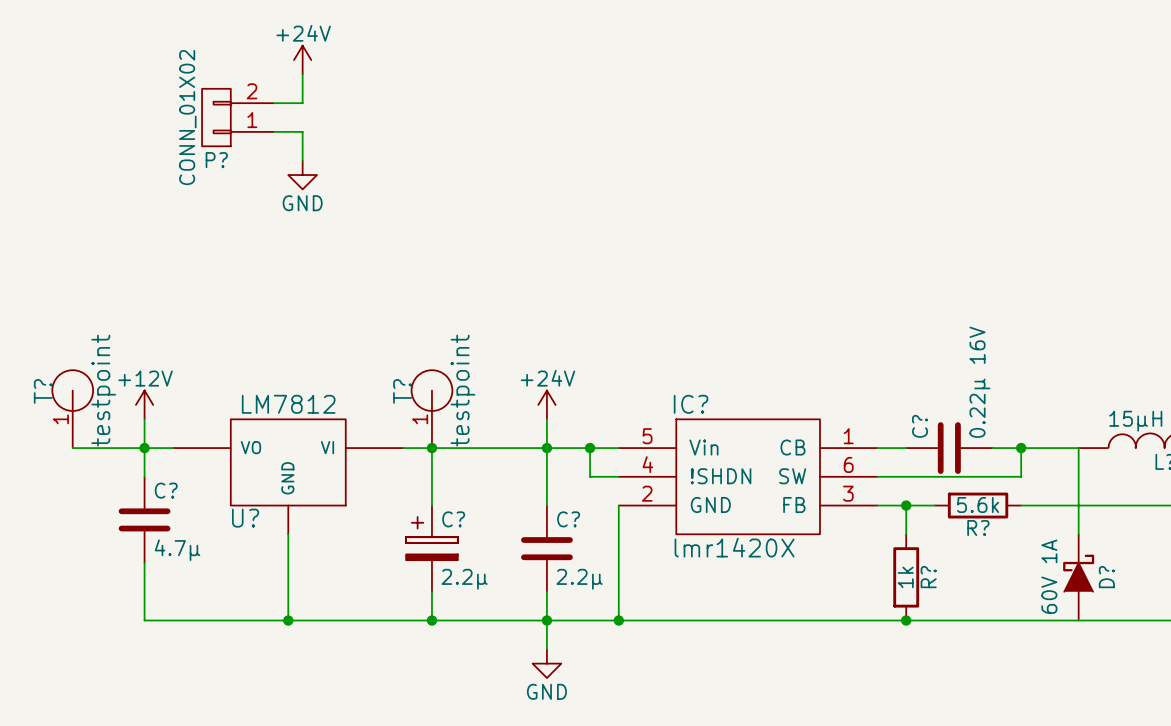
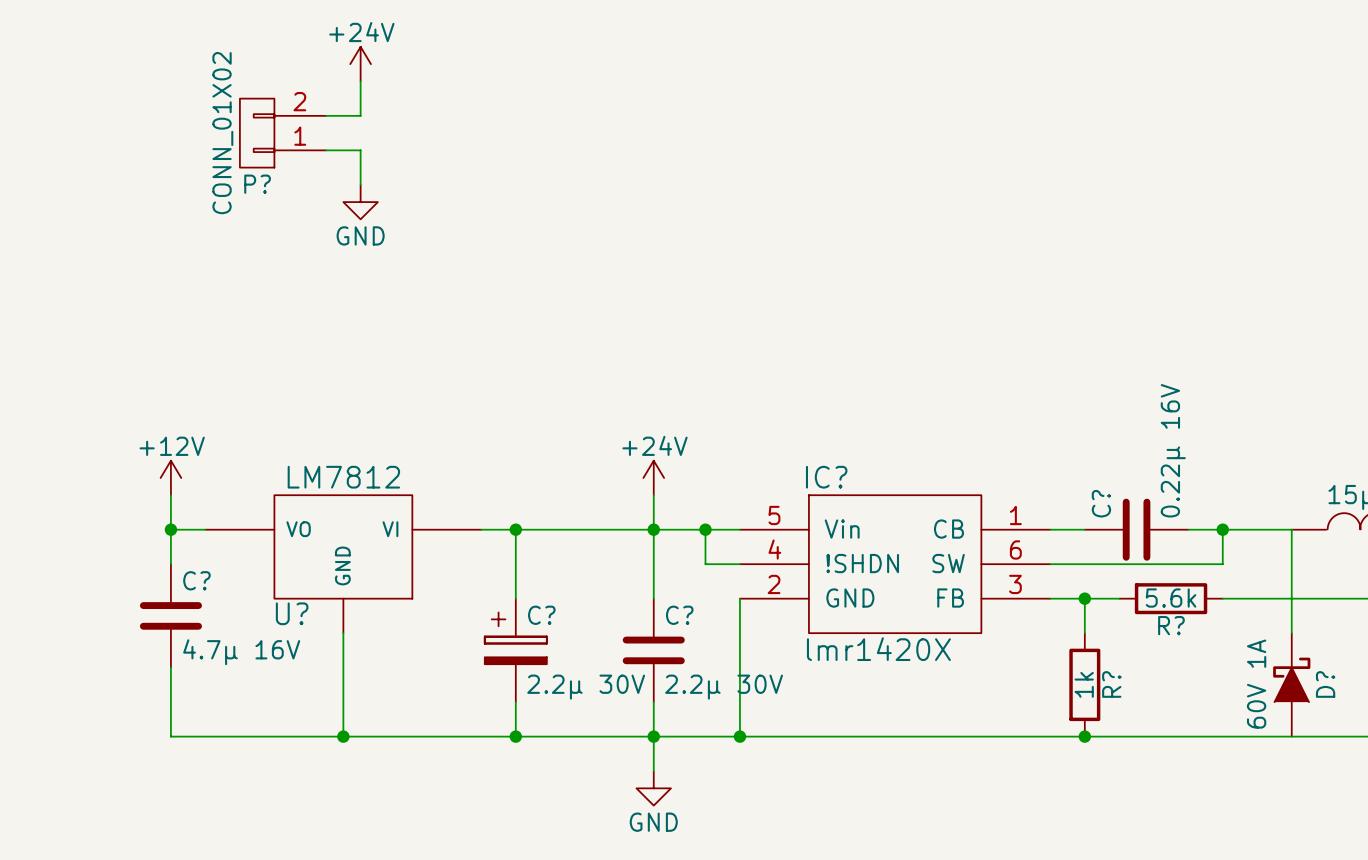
T?: testpoint (72, 409) -> none
T?: testpoint (431, 409) -> none
wire: (72, 448) (144, 448) -> none
C? value: 4.7µ (177, 550) -> 4.7µ 16V (241, 652)
C? value: 2.2µ (464, 579) -> 2.2µ 30V (586, 687)
C? value: 2.2µ (579, 579) -> 2.2µ 30V (724, 687)

